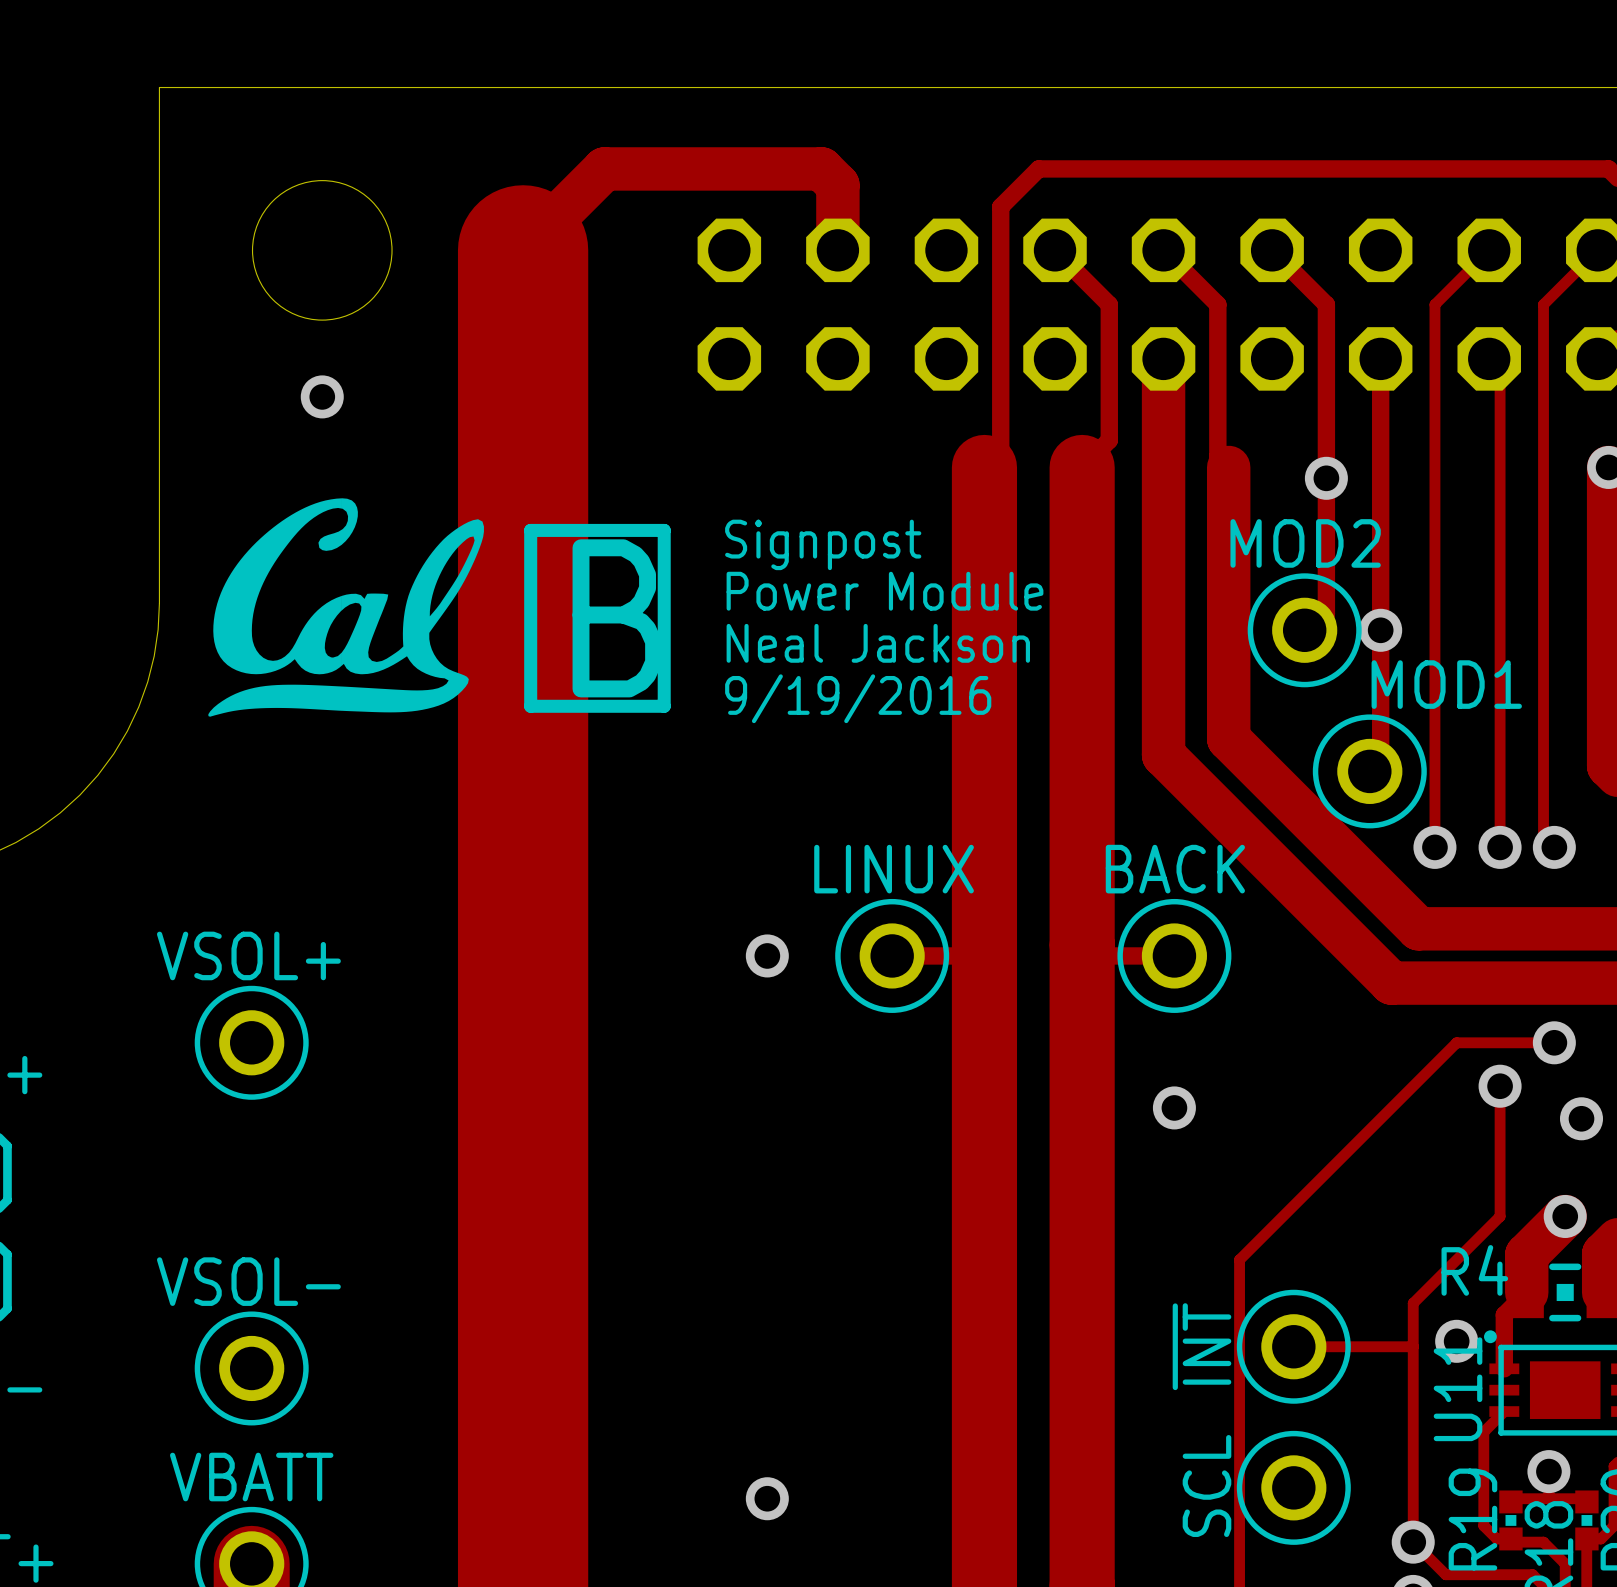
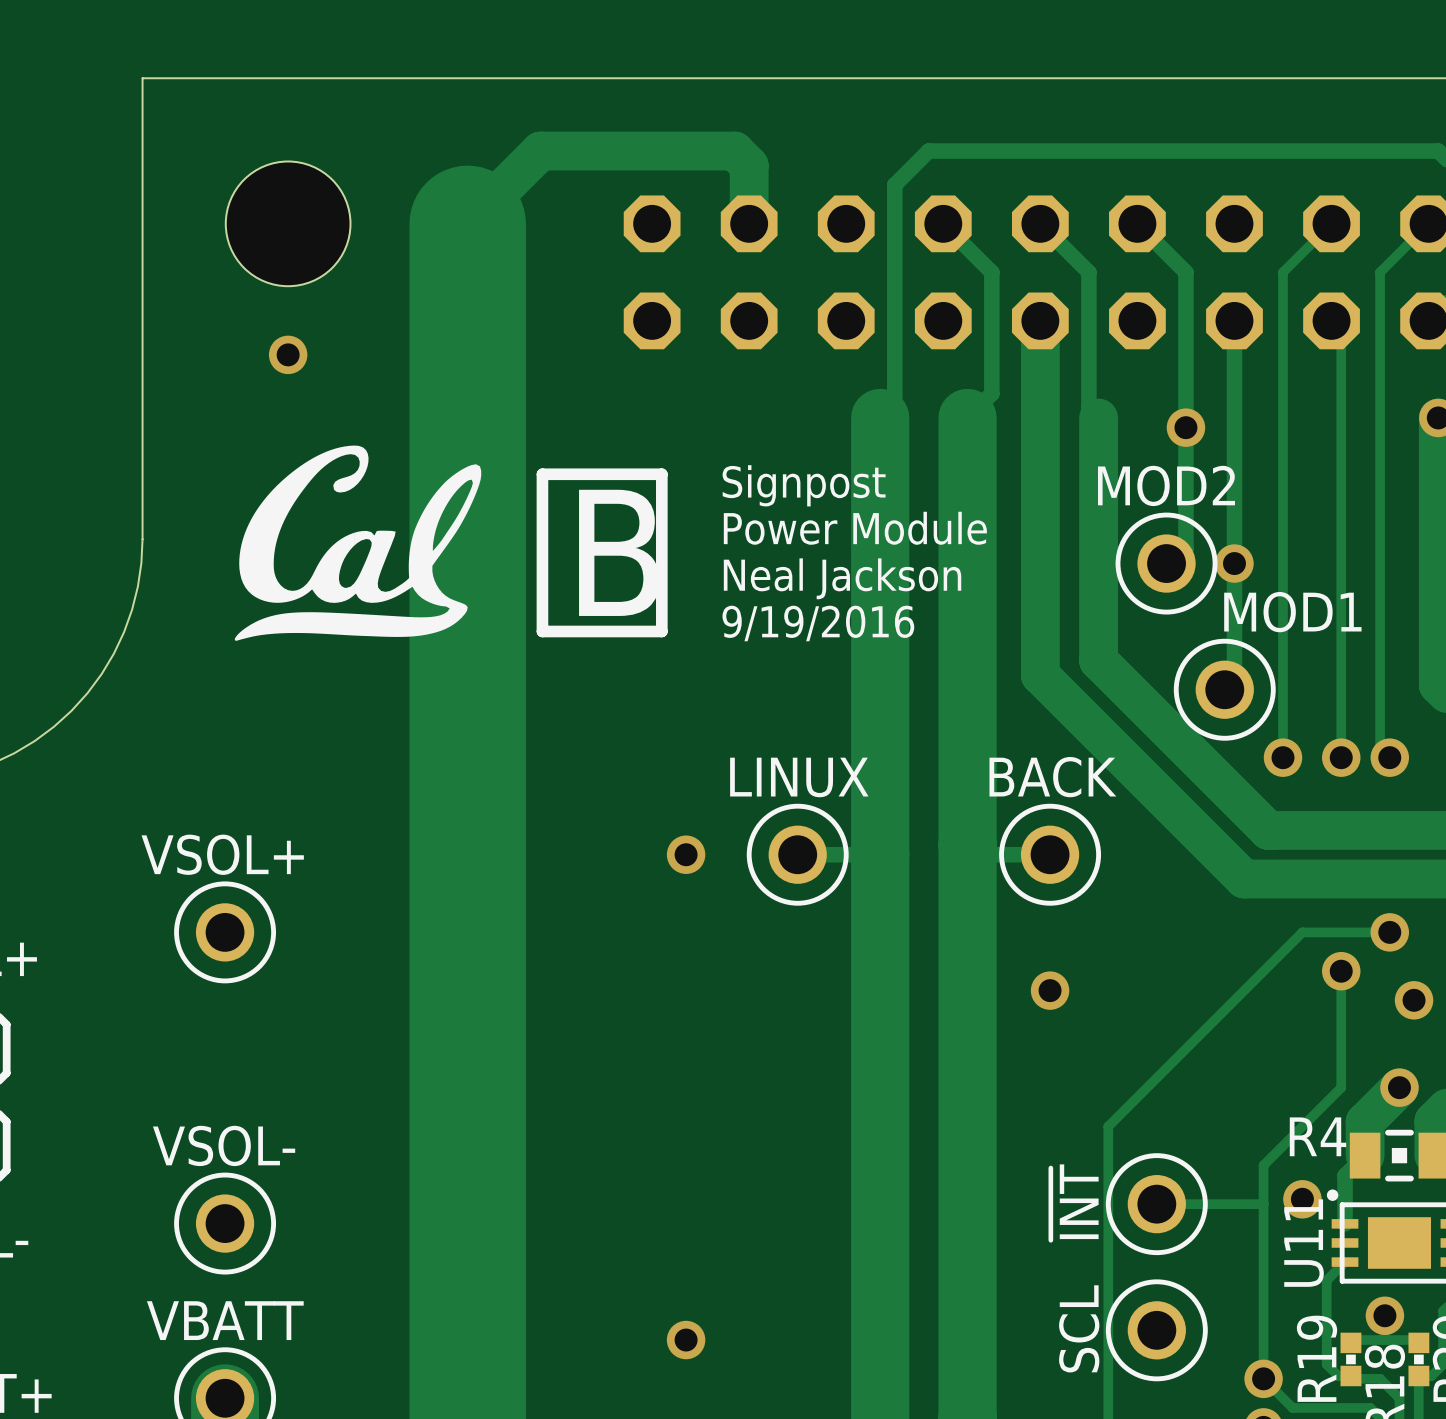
line: (606, 530) (530, 530) (530, 706) (606, 706) -> (542, 474) (542, 631)
line: (664, 530) (664, 706) -> (593, 474) (661, 474) (661, 631) (593, 631)
text position: Signpost (823, 544) -> Signpost (804, 485)
text position: Power Module (885, 591) -> Power Module (855, 528)
drawing position: (346, 607) -> (358, 543)
text: B (617, 618) -> none
text: Neal Jackson (878, 643) -> B (619, 552)
text: none -> Neal Jackson (842, 578)
text position: 9/19/2016 (858, 698) -> 9/19/2016 (818, 623)

